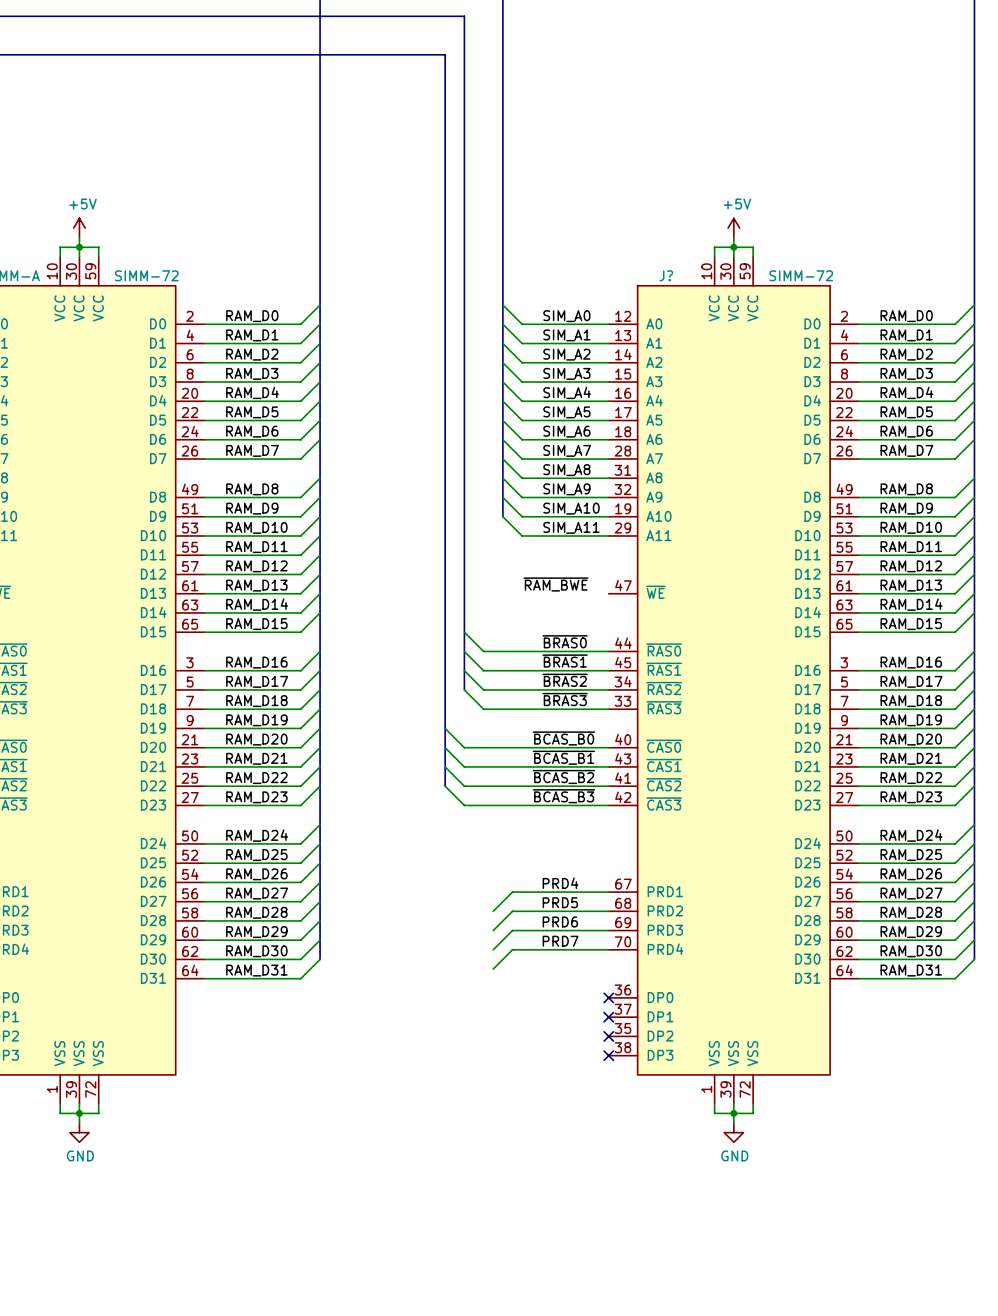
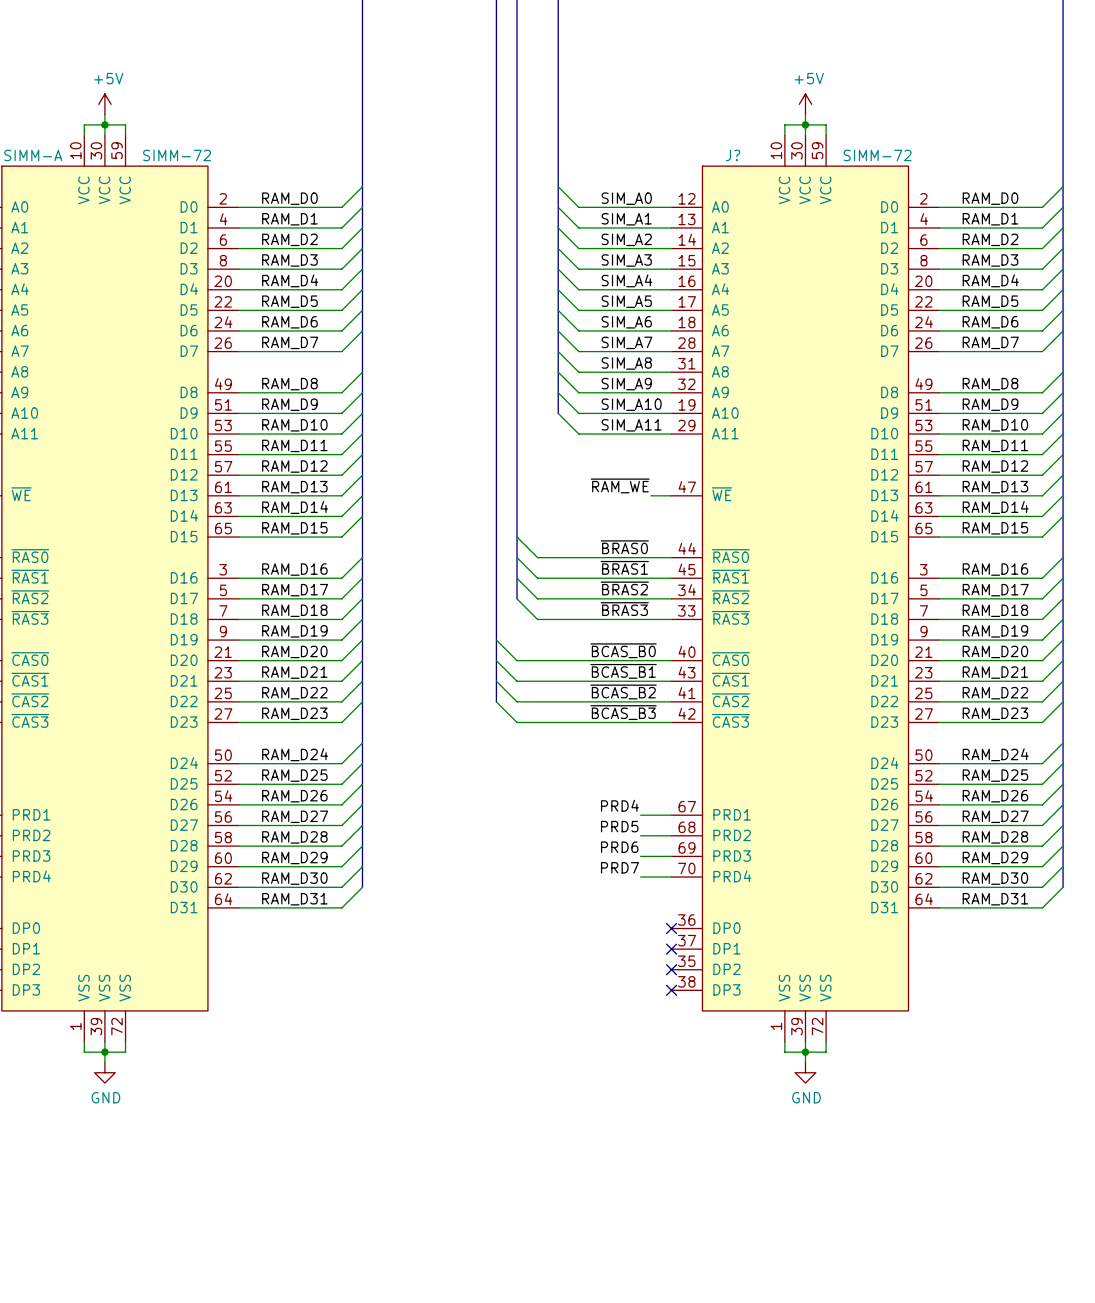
label: ~{RAM_BWE} (555, 584) -> ~{RAM_WE} (620, 485)
wire: none -> (650, 495) (671, 495)
wire: (579, 892) (512, 892) (493, 911) -> none
wire: (579, 911) (512, 911) (493, 930) -> none
wire: (579, 930) (512, 930) (493, 949) -> none
wire: (579, 949) (512, 949) (493, 969) -> none

